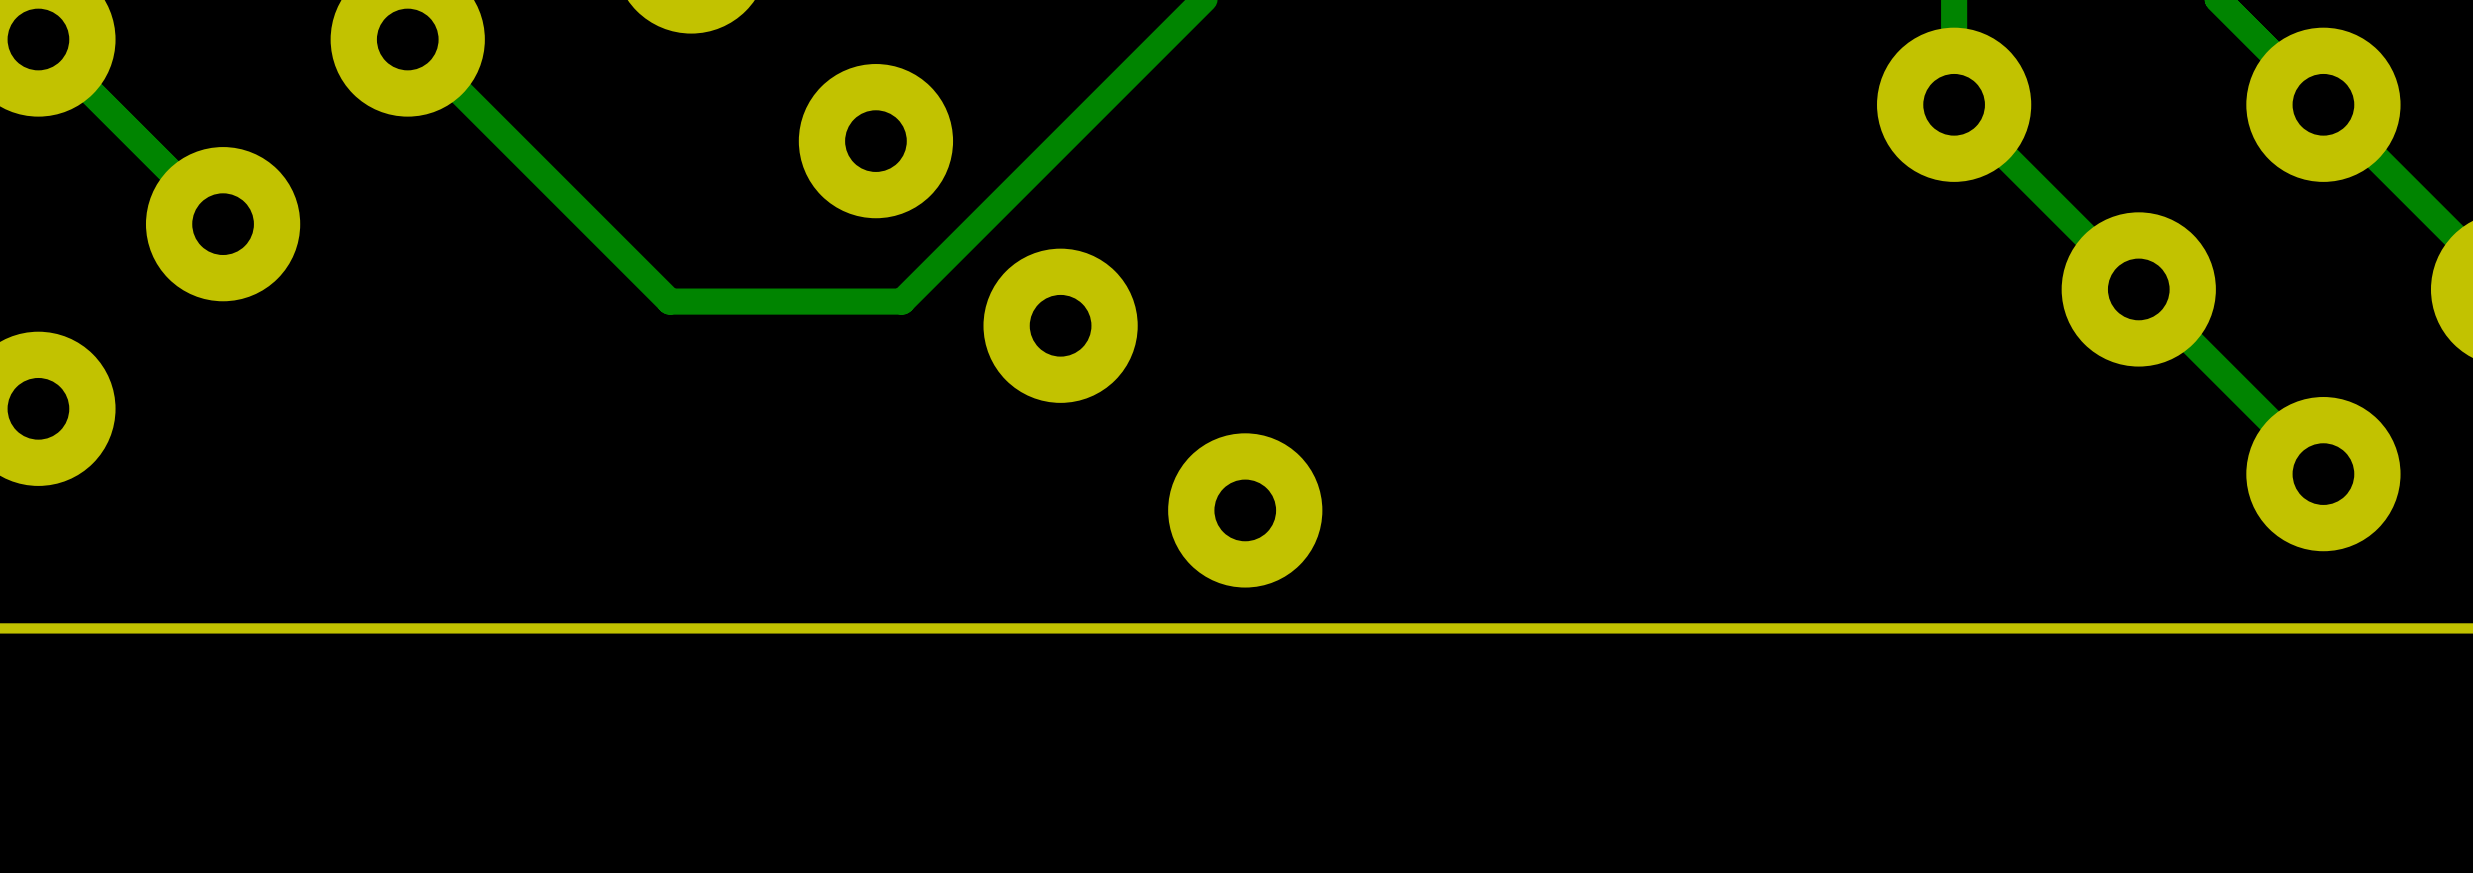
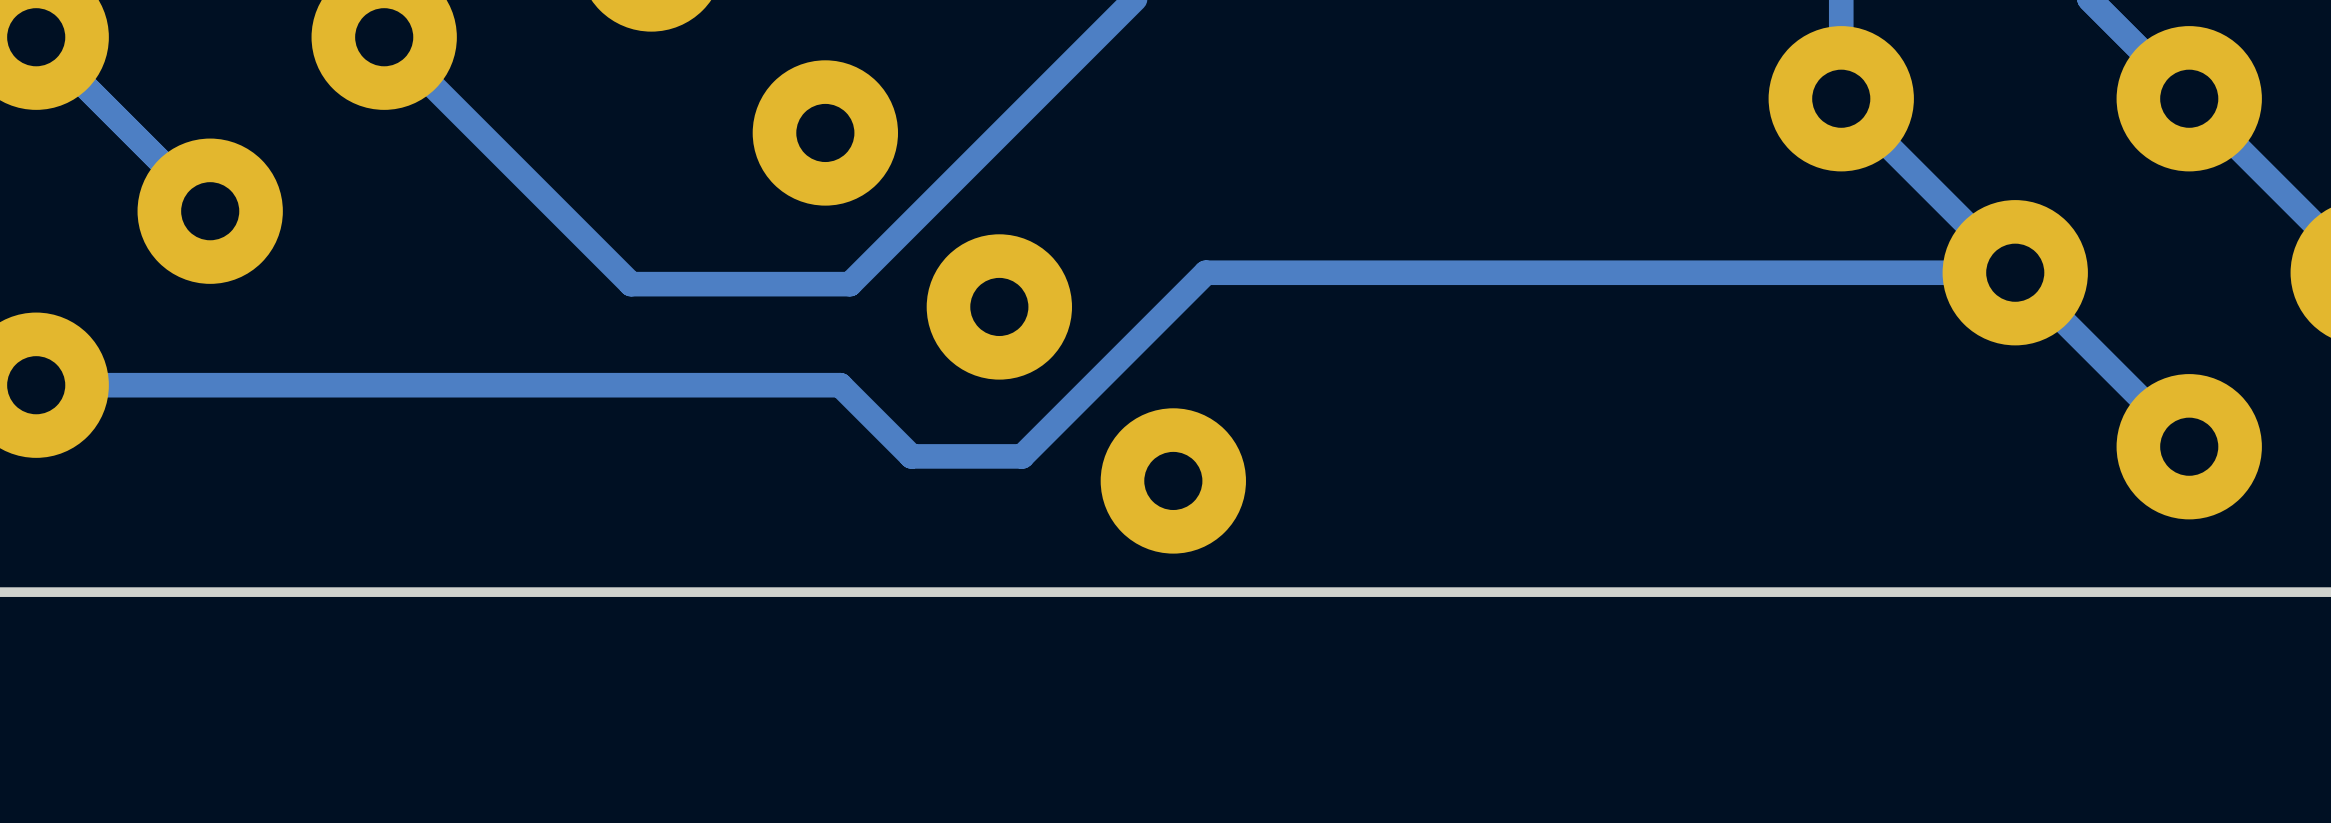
track: none -> (2015, 272) (1205, 272) (1022, 456) (911, 456) (840, 385) (36, 385)

